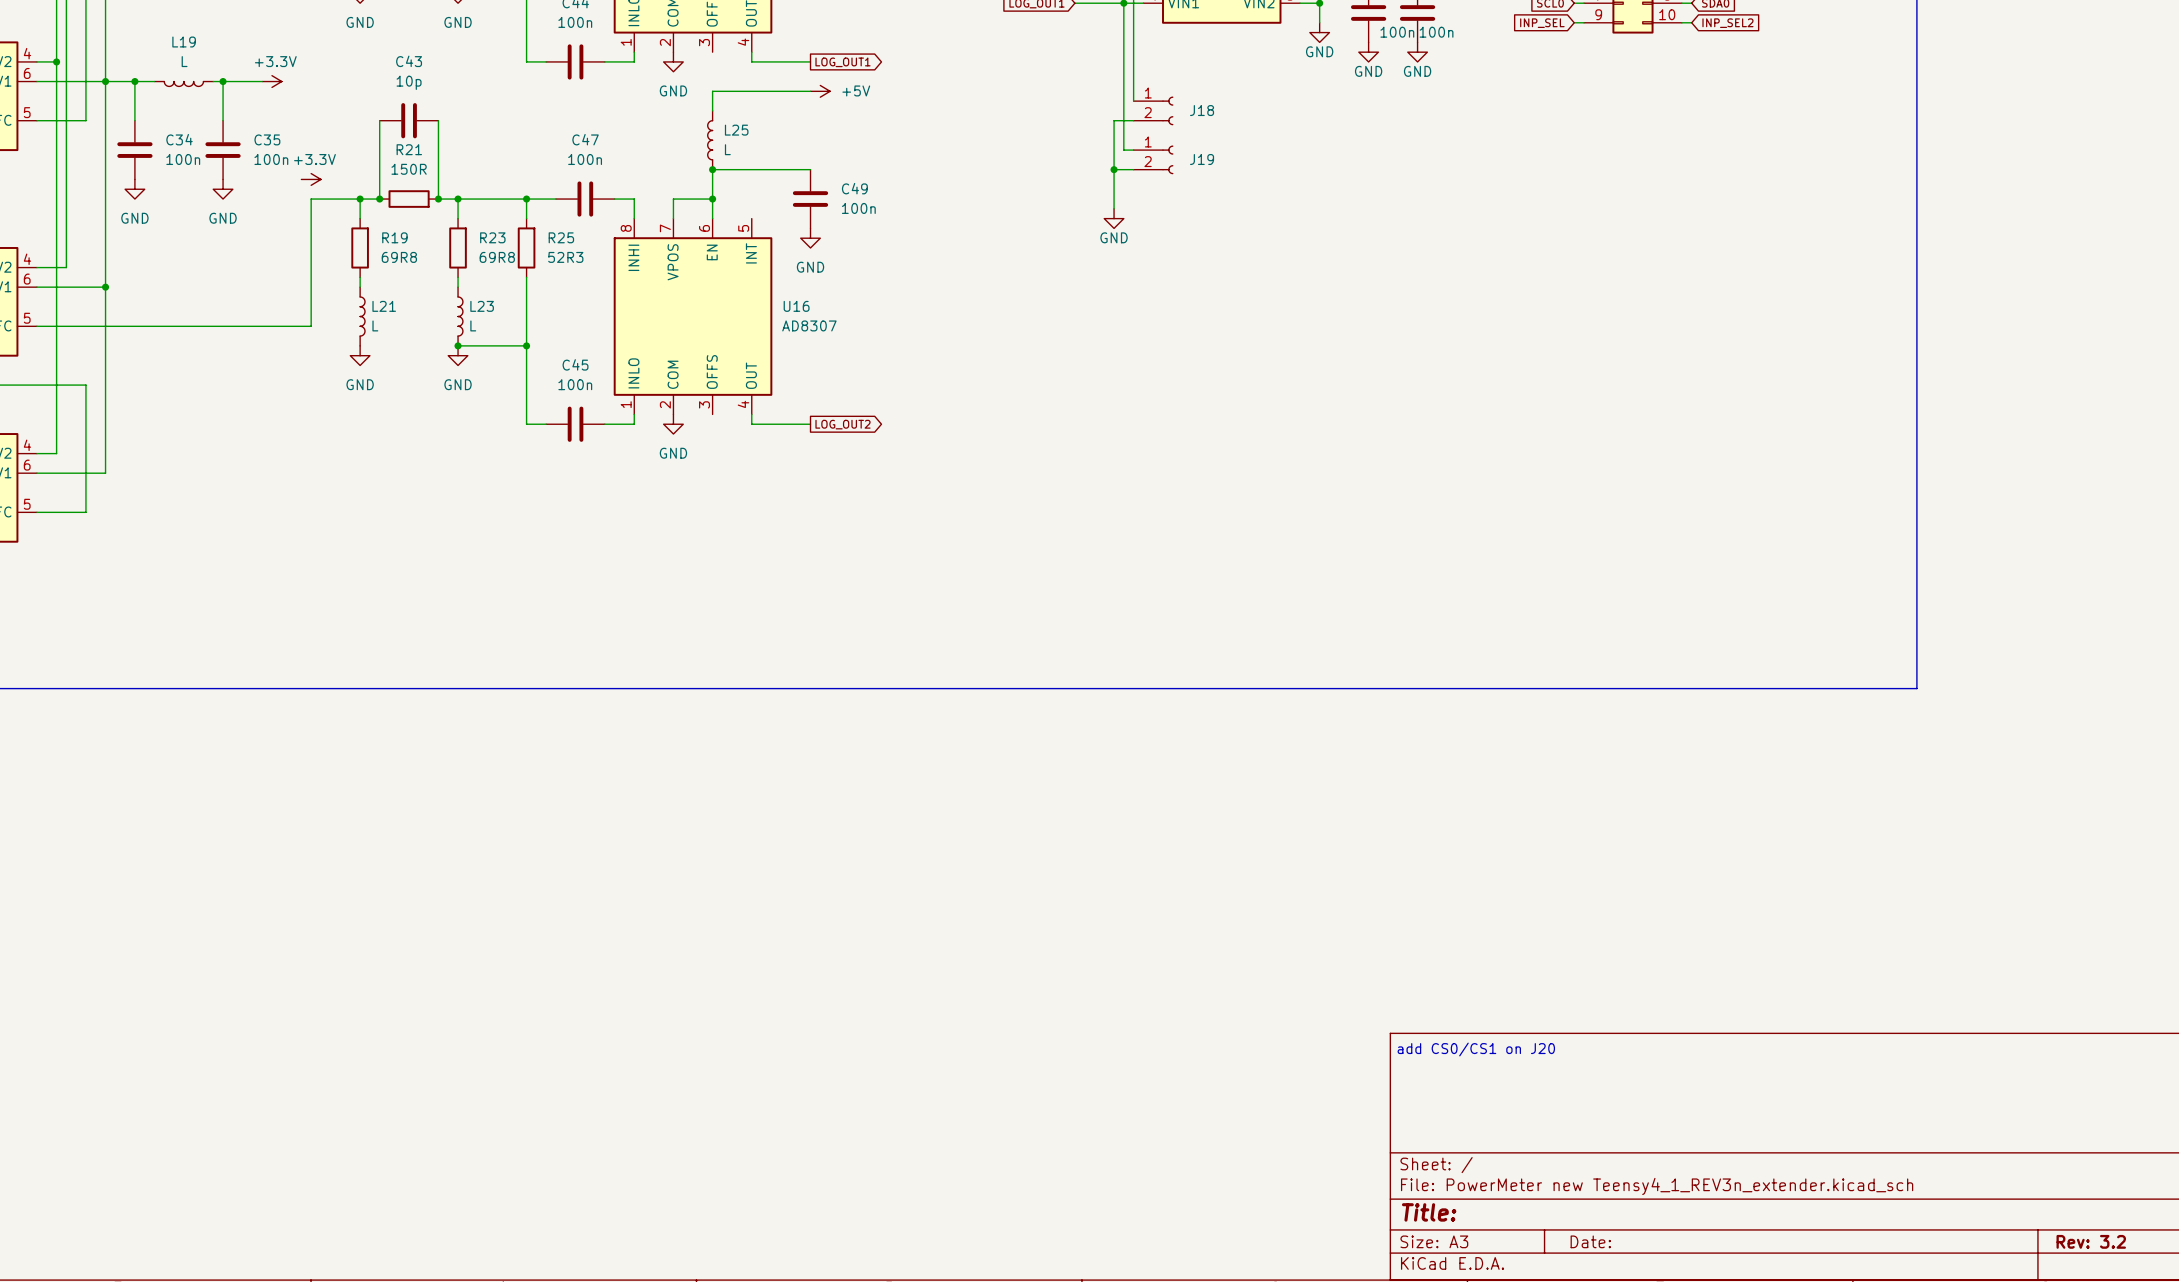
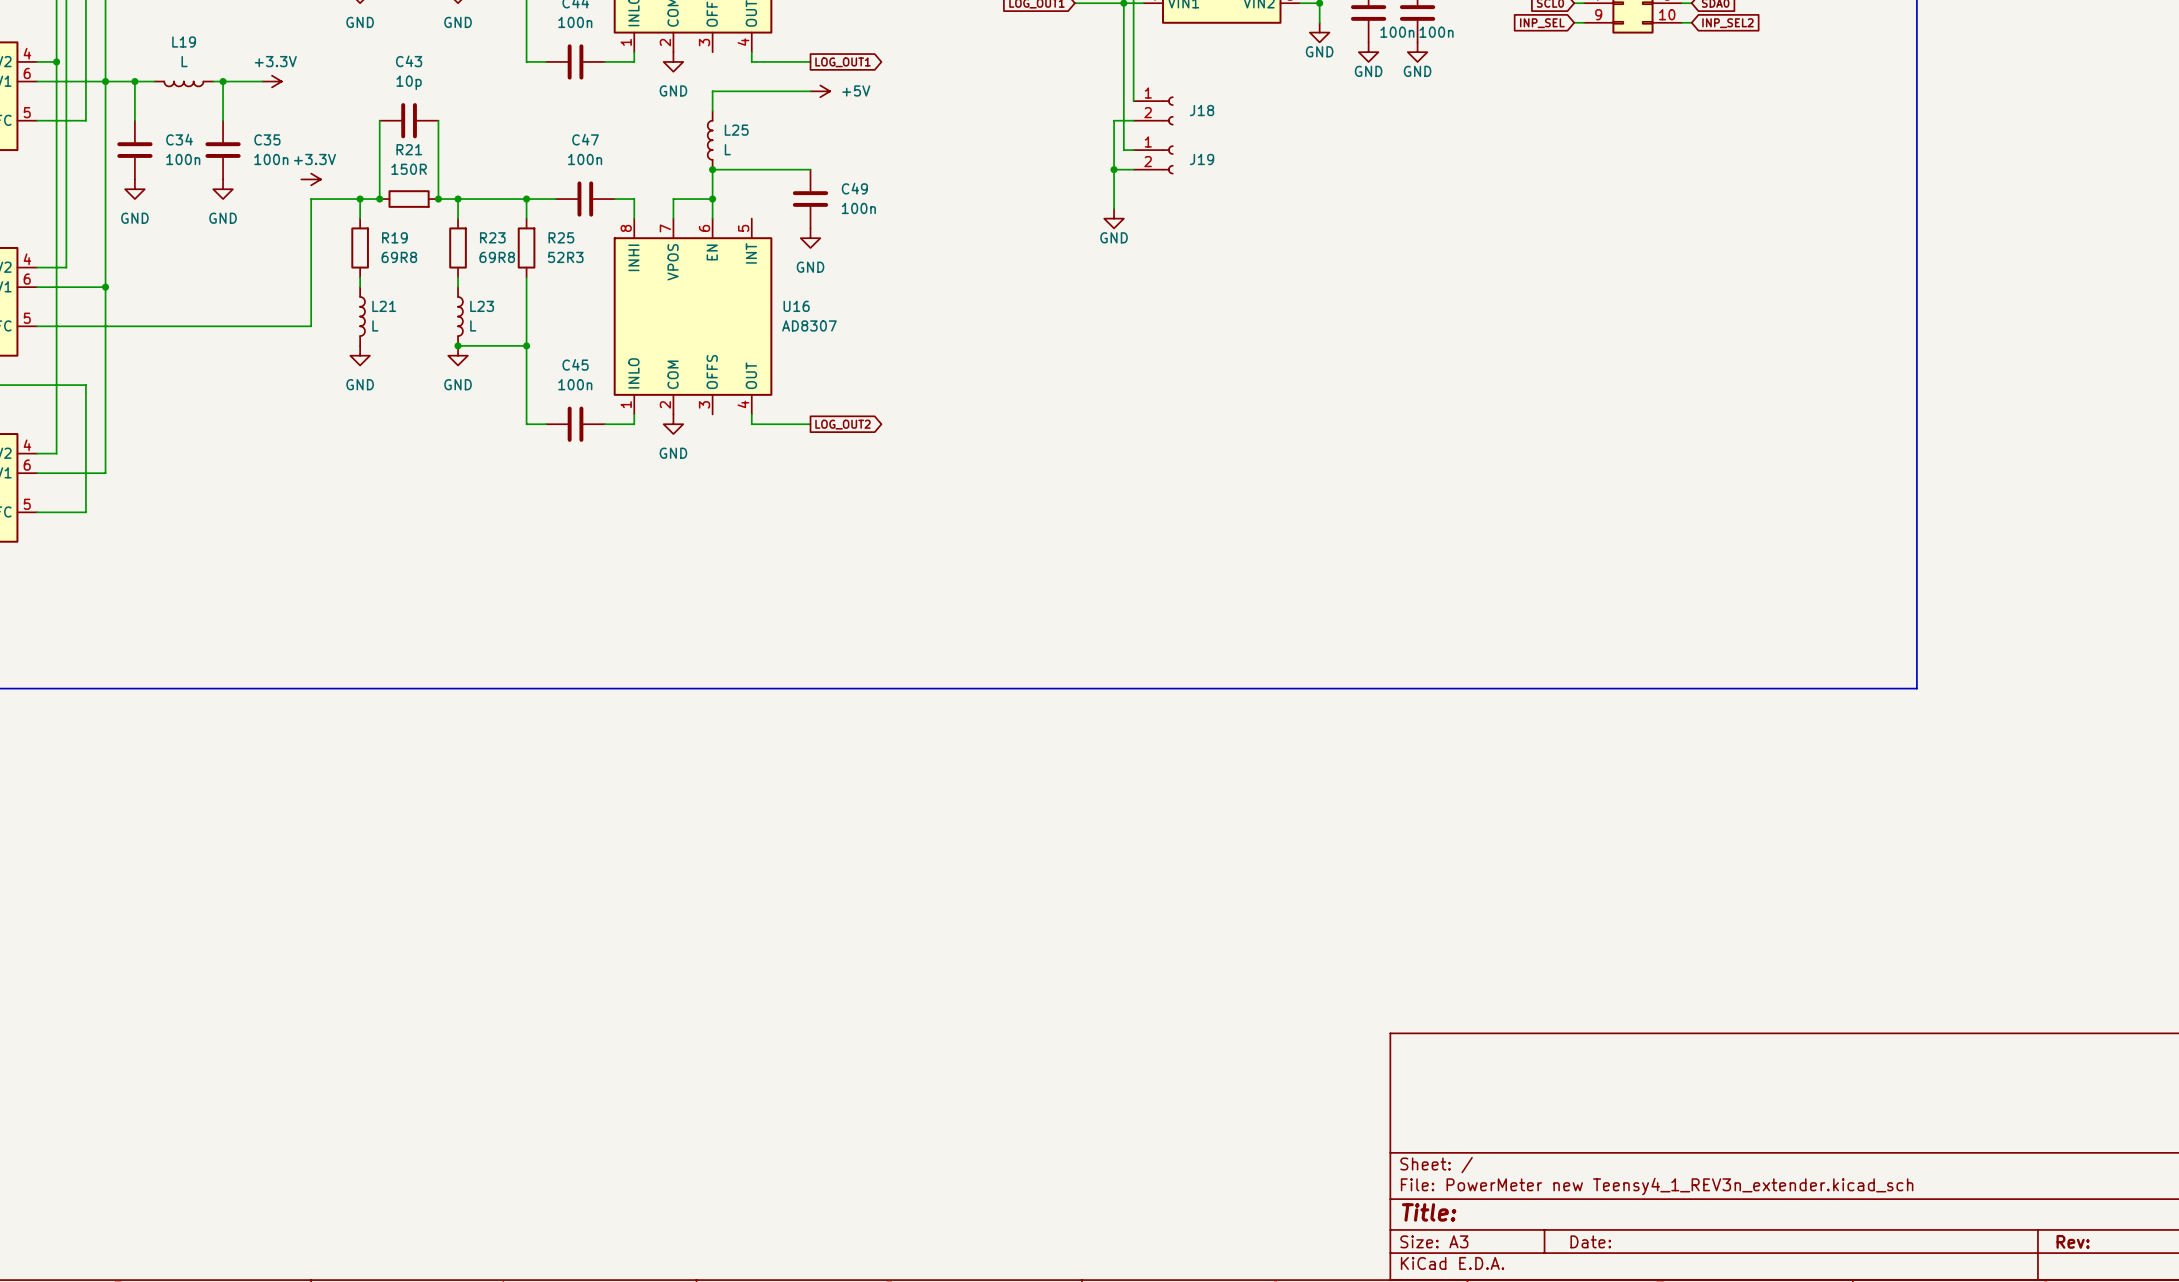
text: add CS0/CS1 on J20 (1476, 1049) -> none
title block: Rev: 3.2 (2091, 1241) -> Rev: (2073, 1241)

